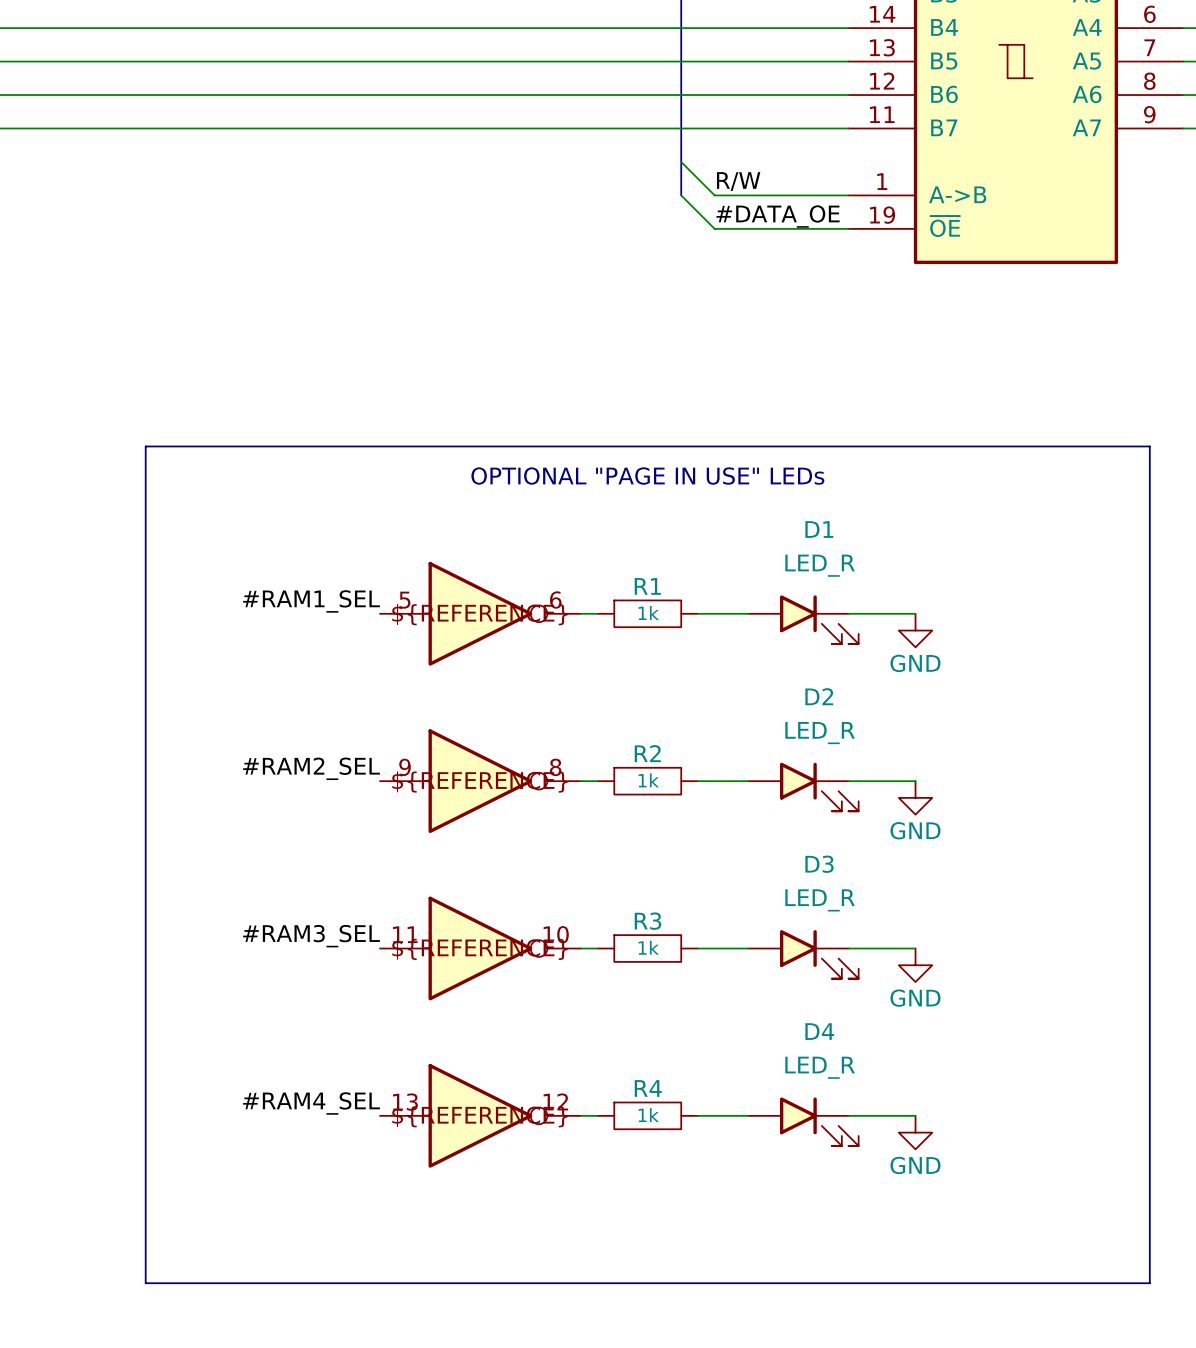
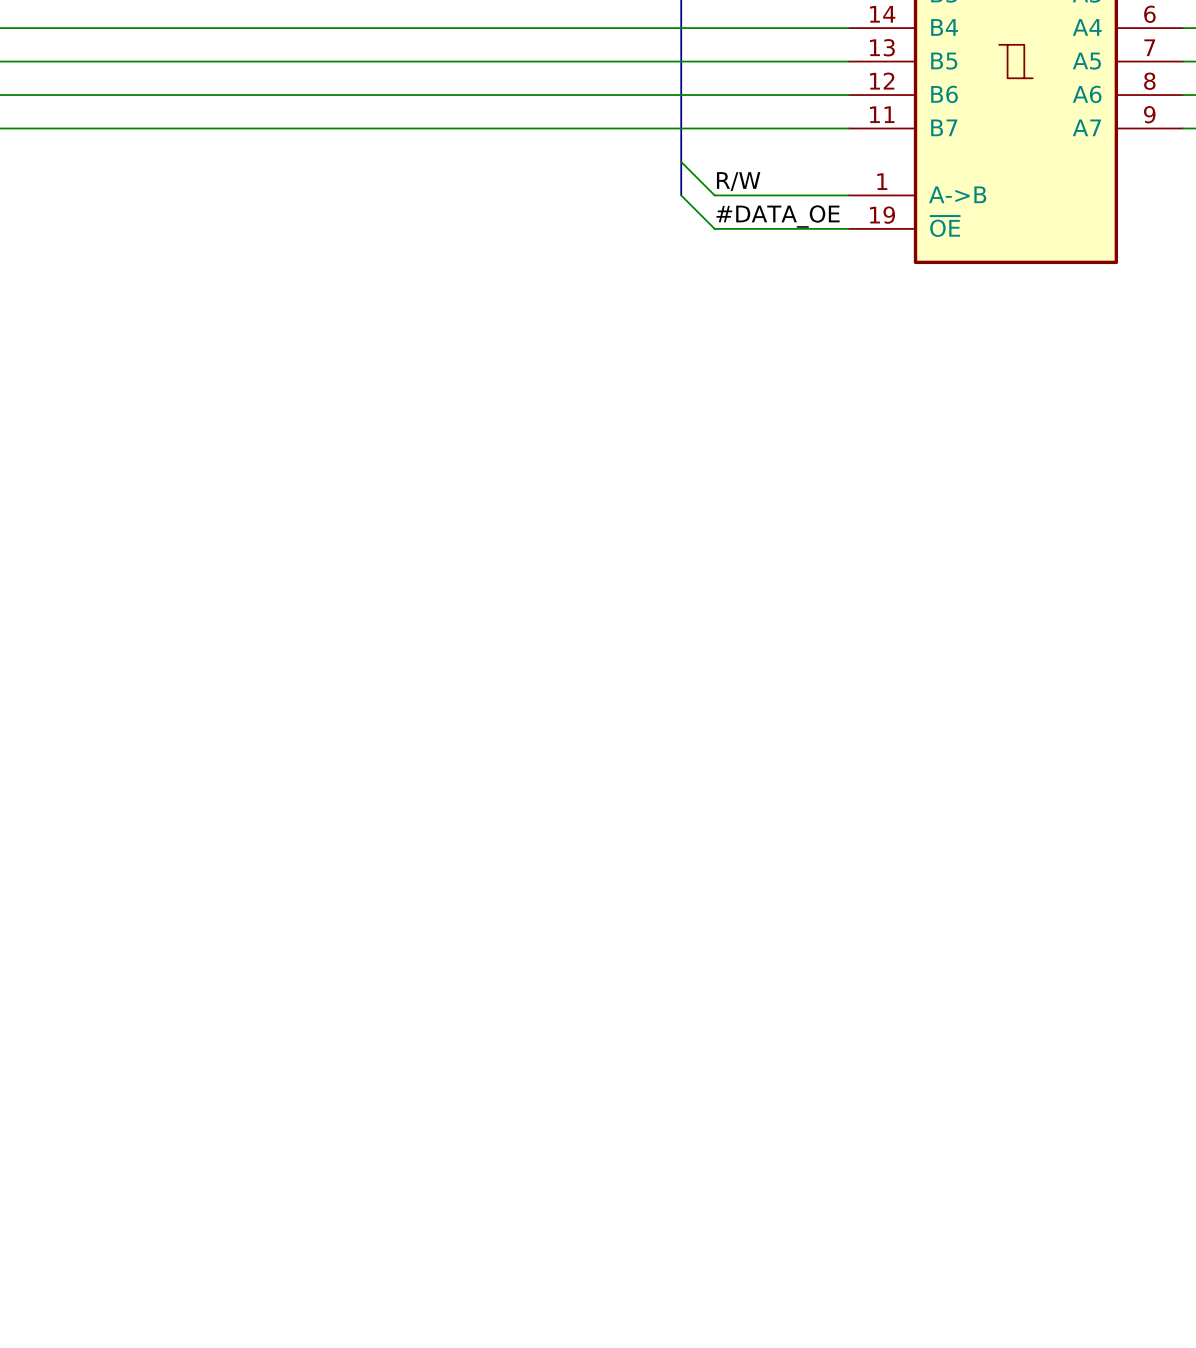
line: (145, 446) (1149, 446) (1149, 1283) (145, 1283) (145, 446) -> none
text: OPTIONAL "PAGE IN USE" LEDs (647, 476) -> none
label: #RAM1_SEL (311, 601) -> none
part: (480, 613) -> none
wire: (580, 613) (597, 613) -> none
R1: 1k (647, 613) -> none
wire: (697, 613) (748, 613) -> none
wire: (848, 613) (915, 613) -> none
D1: LED_R (803, 619) -> none
power symbol: GND (915, 630) -> none
label: #RAM2_SEL (311, 768) -> none
part: (480, 781) -> none
wire: (580, 781) (597, 781) -> none
R2: 1k (647, 781) -> none
wire: (697, 781) (748, 781) -> none
wire: (848, 781) (915, 781) -> none
D2: LED_R (803, 787) -> none
power symbol: GND (915, 797) -> none
label: #RAM3_SEL (311, 936) -> none
part: (480, 948) -> none
wire: (580, 948) (597, 948) -> none
R3: 1k (647, 948) -> none
wire: (697, 948) (748, 948) -> none
wire: (848, 948) (915, 948) -> none
D3: LED_R (803, 954) -> none
power symbol: GND (915, 965) -> none
label: #RAM4_SEL (311, 1103) -> none
part: (480, 1115) -> none
wire: (580, 1115) (597, 1115) -> none
R4: 1k (647, 1115) -> none
wire: (697, 1115) (748, 1115) -> none
wire: (848, 1115) (915, 1115) -> none
D4: LED_R (803, 1121) -> none
power symbol: GND (915, 1132) -> none

